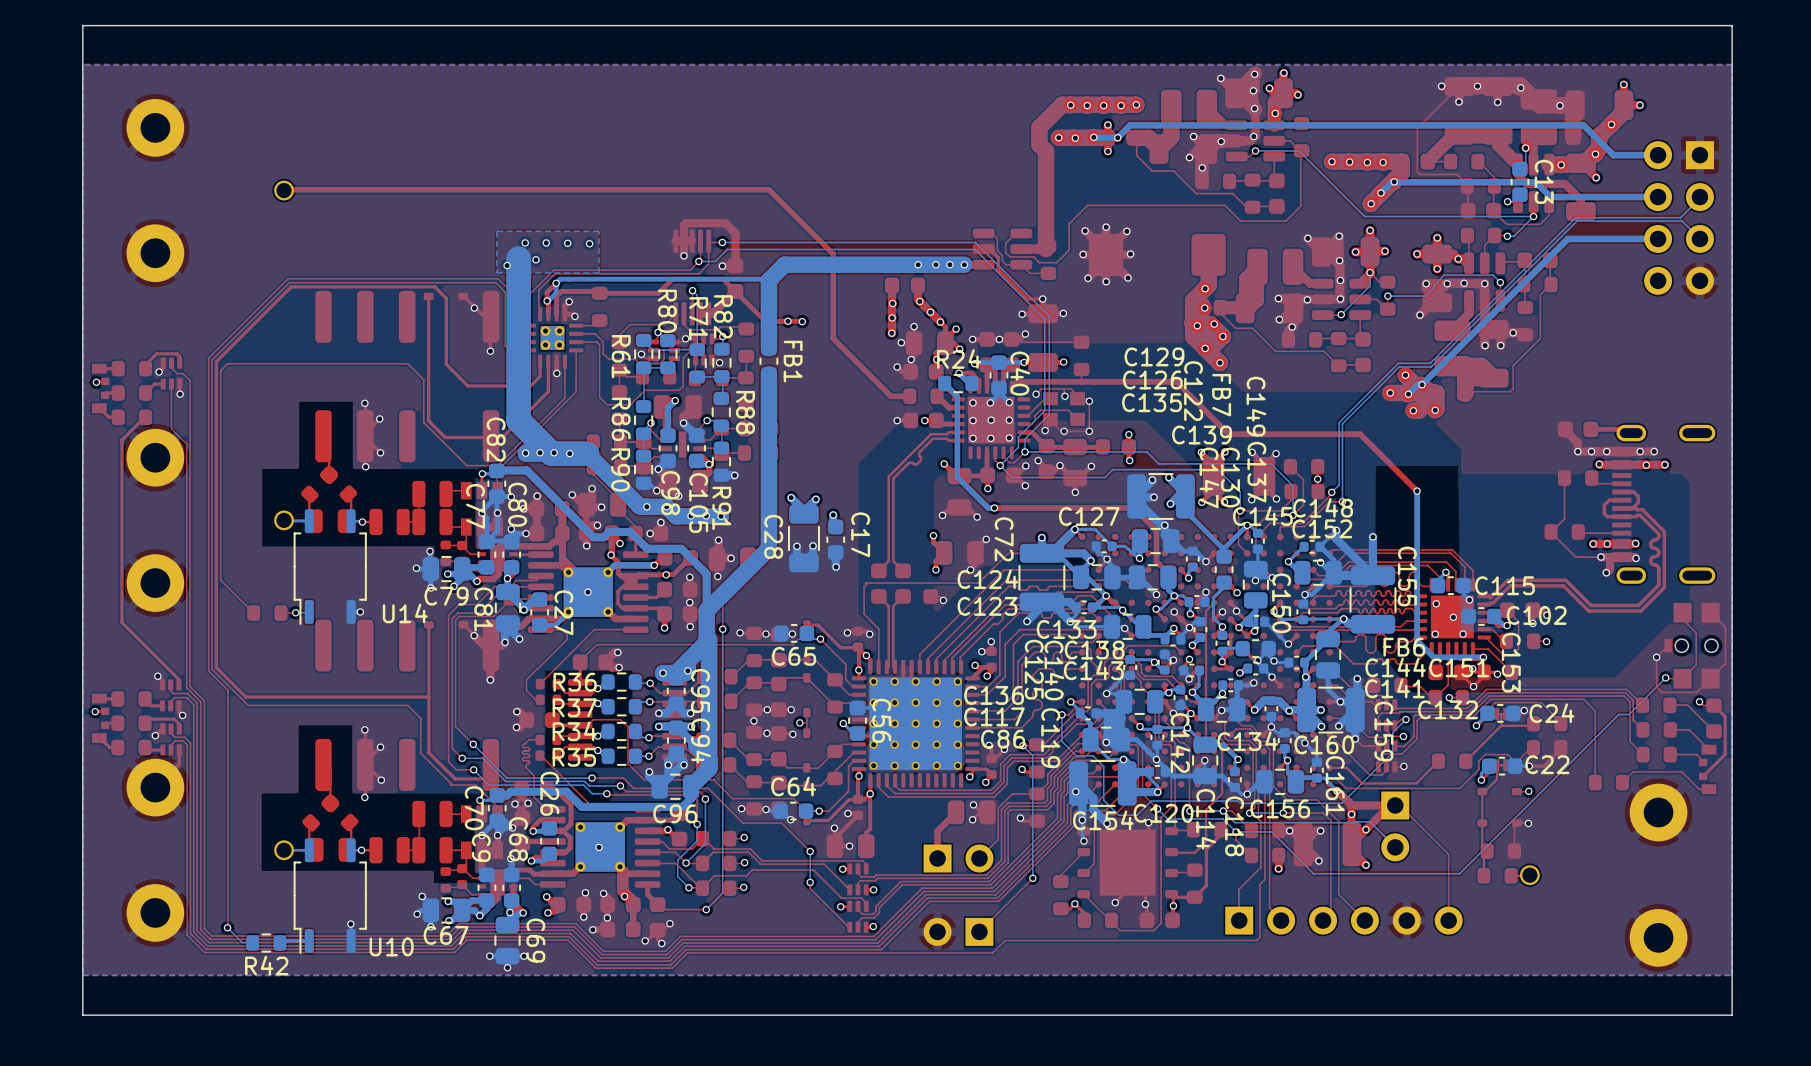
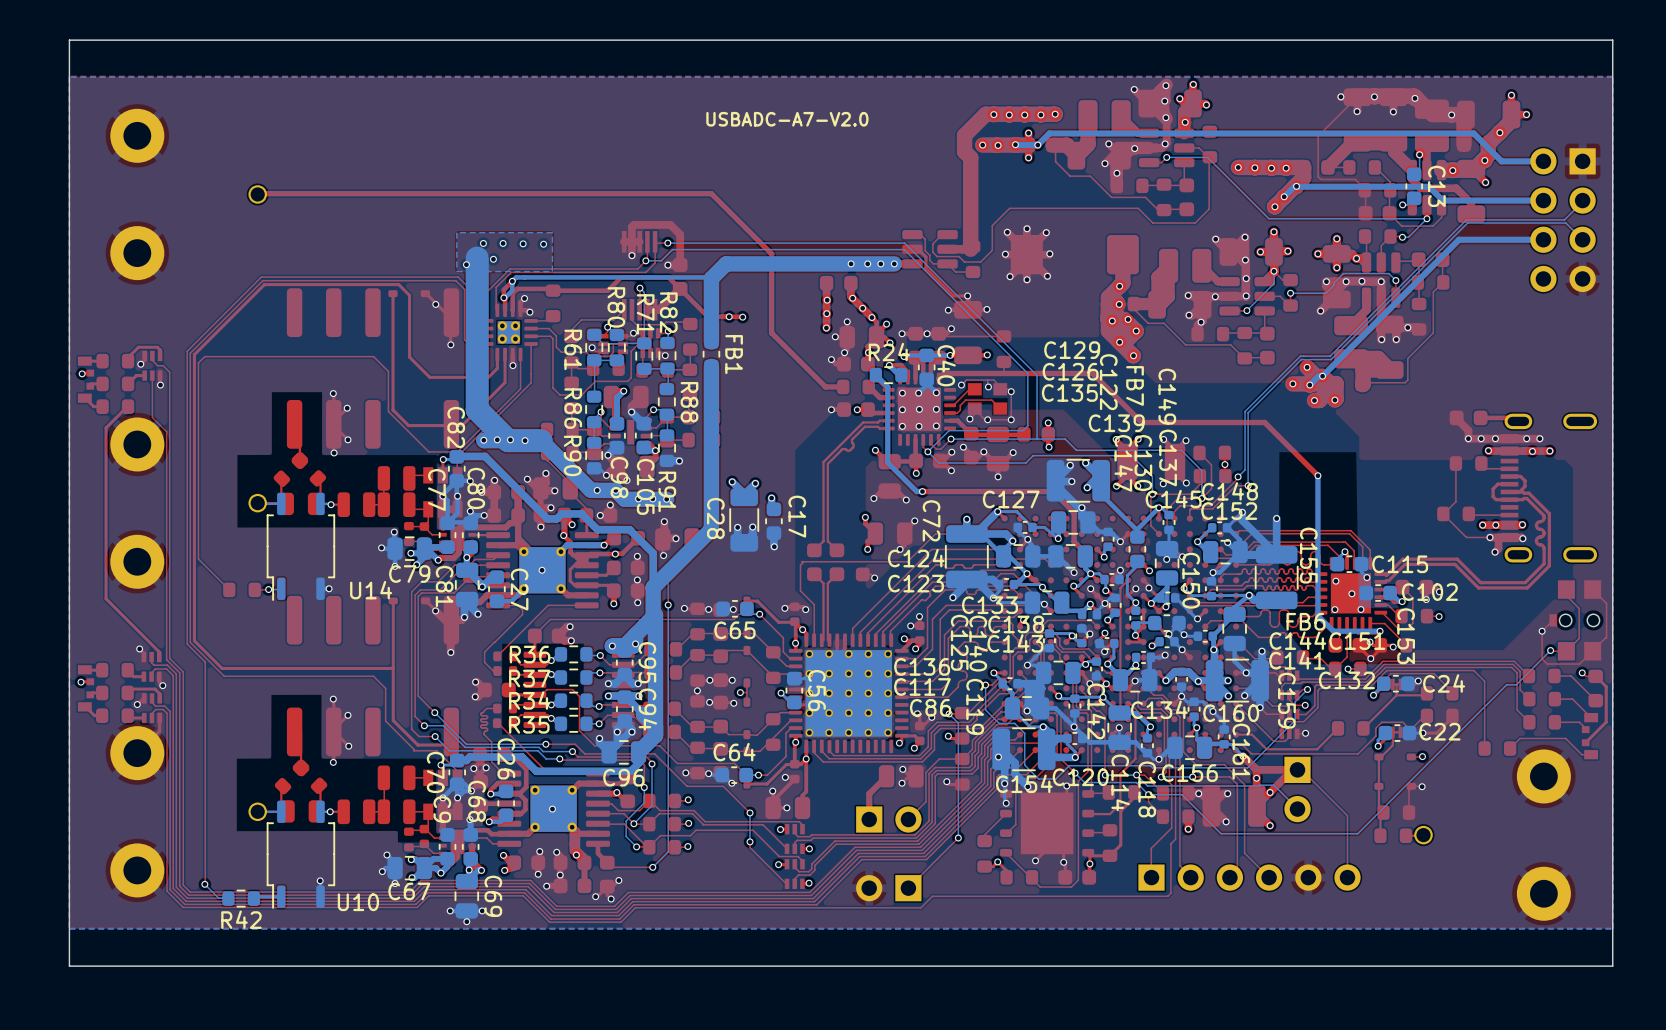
text: none -> USBADC-A7-V2.0 (787, 119)
bottom track: (1049, 316) (1049, 414) (1024, 439) (1024, 451) -> (973, 312) (1037, 375) (1037, 439)
bottom track: (1042, 317) (1044, 319) (1044, 410) (1018, 437) (1018, 447) -> (967, 313) (1027, 373) (1027, 425) (1023, 430) (949, 430) (944, 434)

